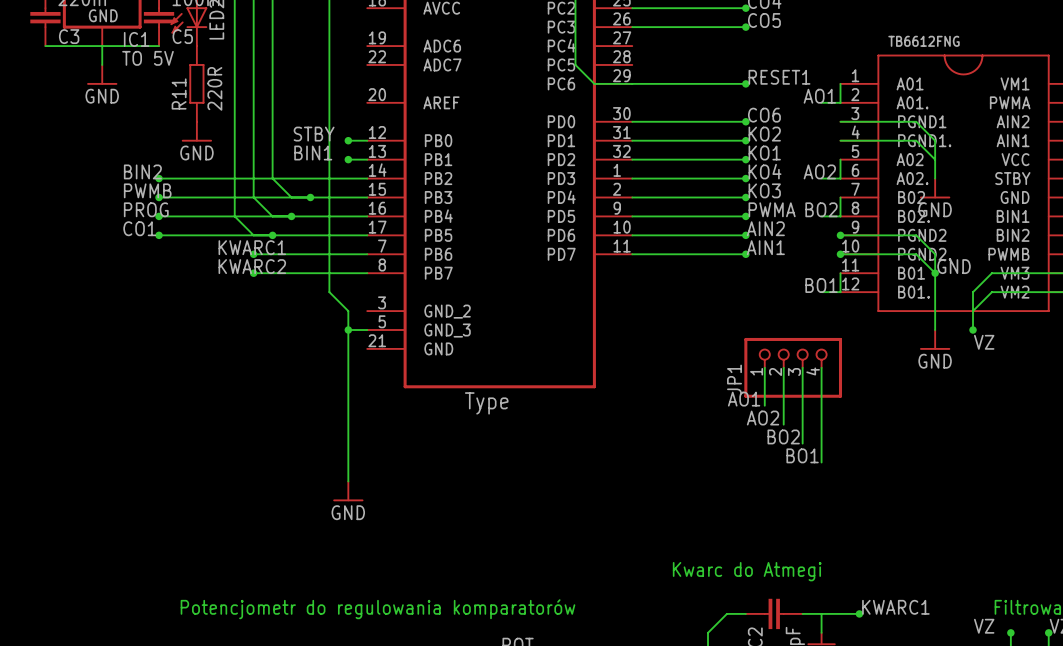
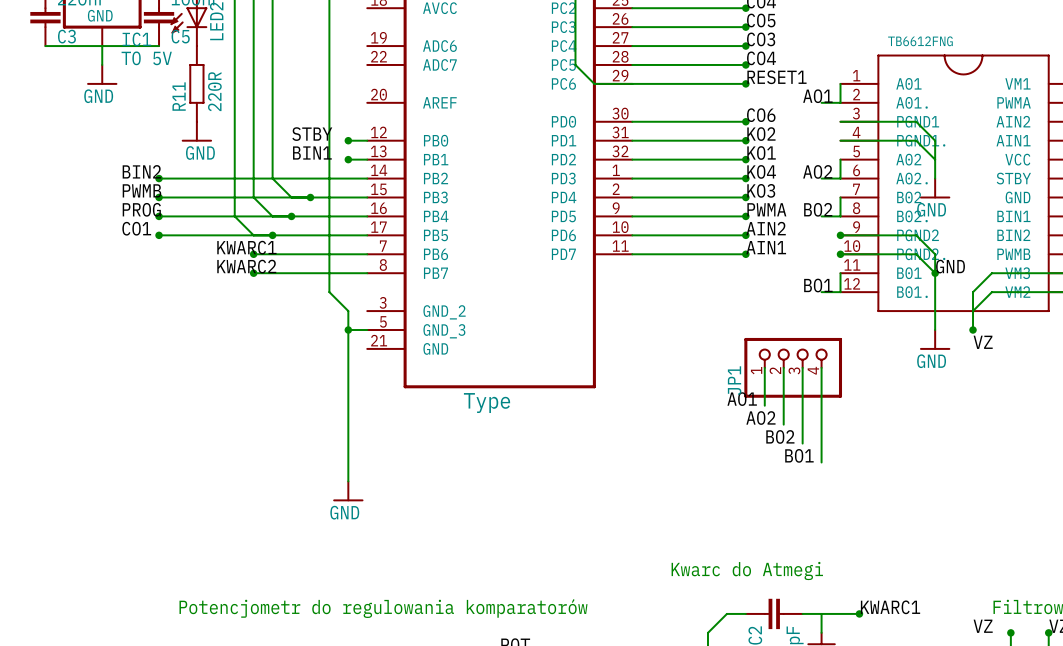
label: none -> CO3 (761, 39)
wire: none -> (632, 46) (745, 46)
junction: none -> (745, 46)
label: none -> CO4 (761, 58)
wire: none -> (632, 64) (745, 64)
junction: none -> (745, 64)

